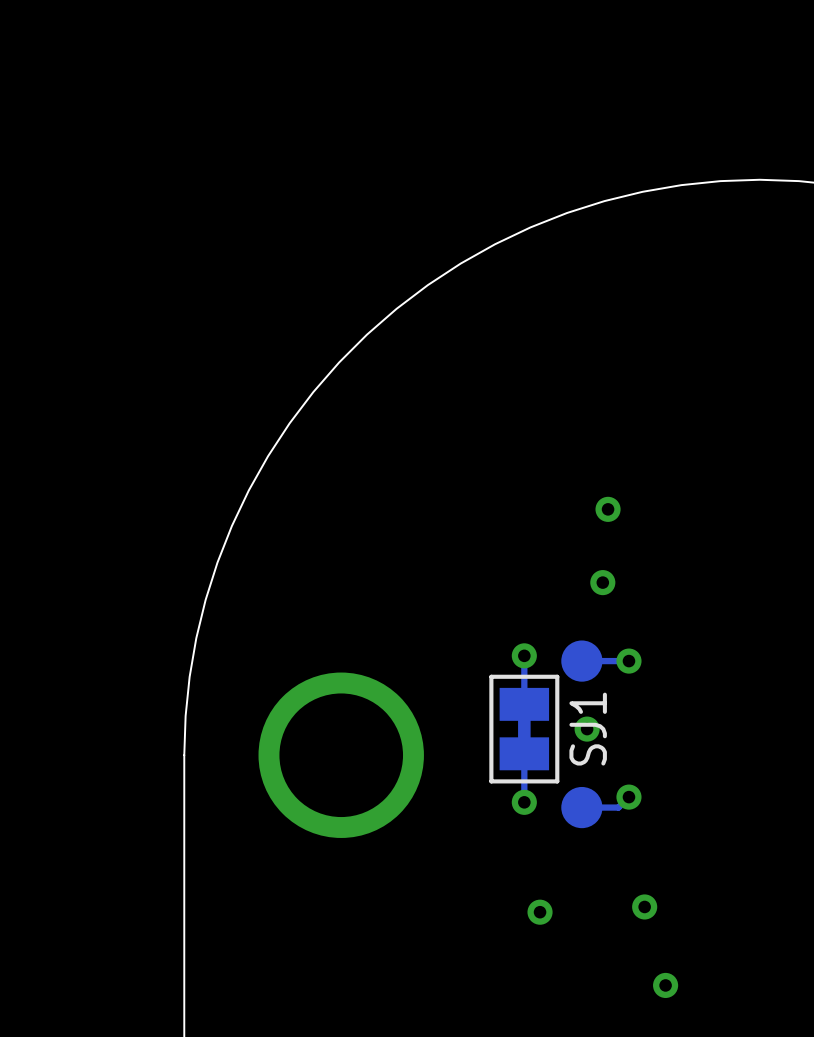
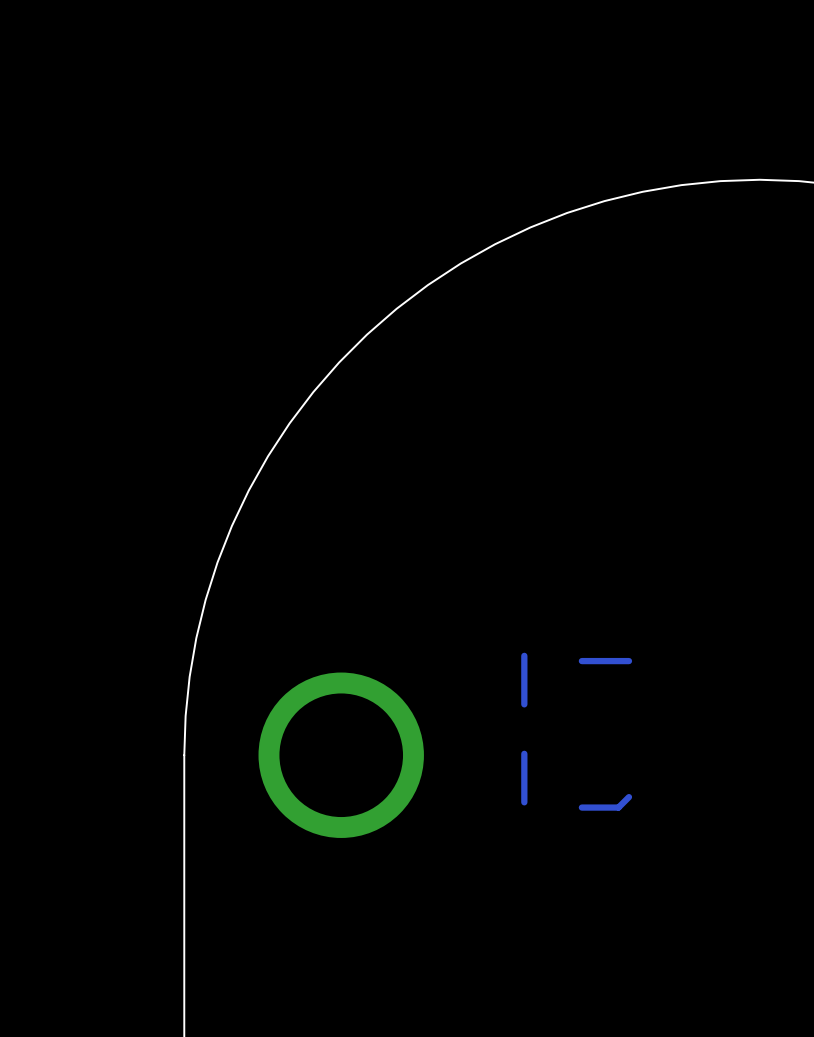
via: (608, 509) -> none
via: (602, 582) -> none
via: (524, 655) -> none
part: (581, 661) -> none
via: (628, 661) -> none
SJ1: (524, 729) -> none
via: (587, 729) -> none
via: (628, 797) -> none
via: (524, 802) -> none
part: (581, 807) -> none
via: (644, 906) -> none
via: (540, 912) -> none
via: (665, 985) -> none

